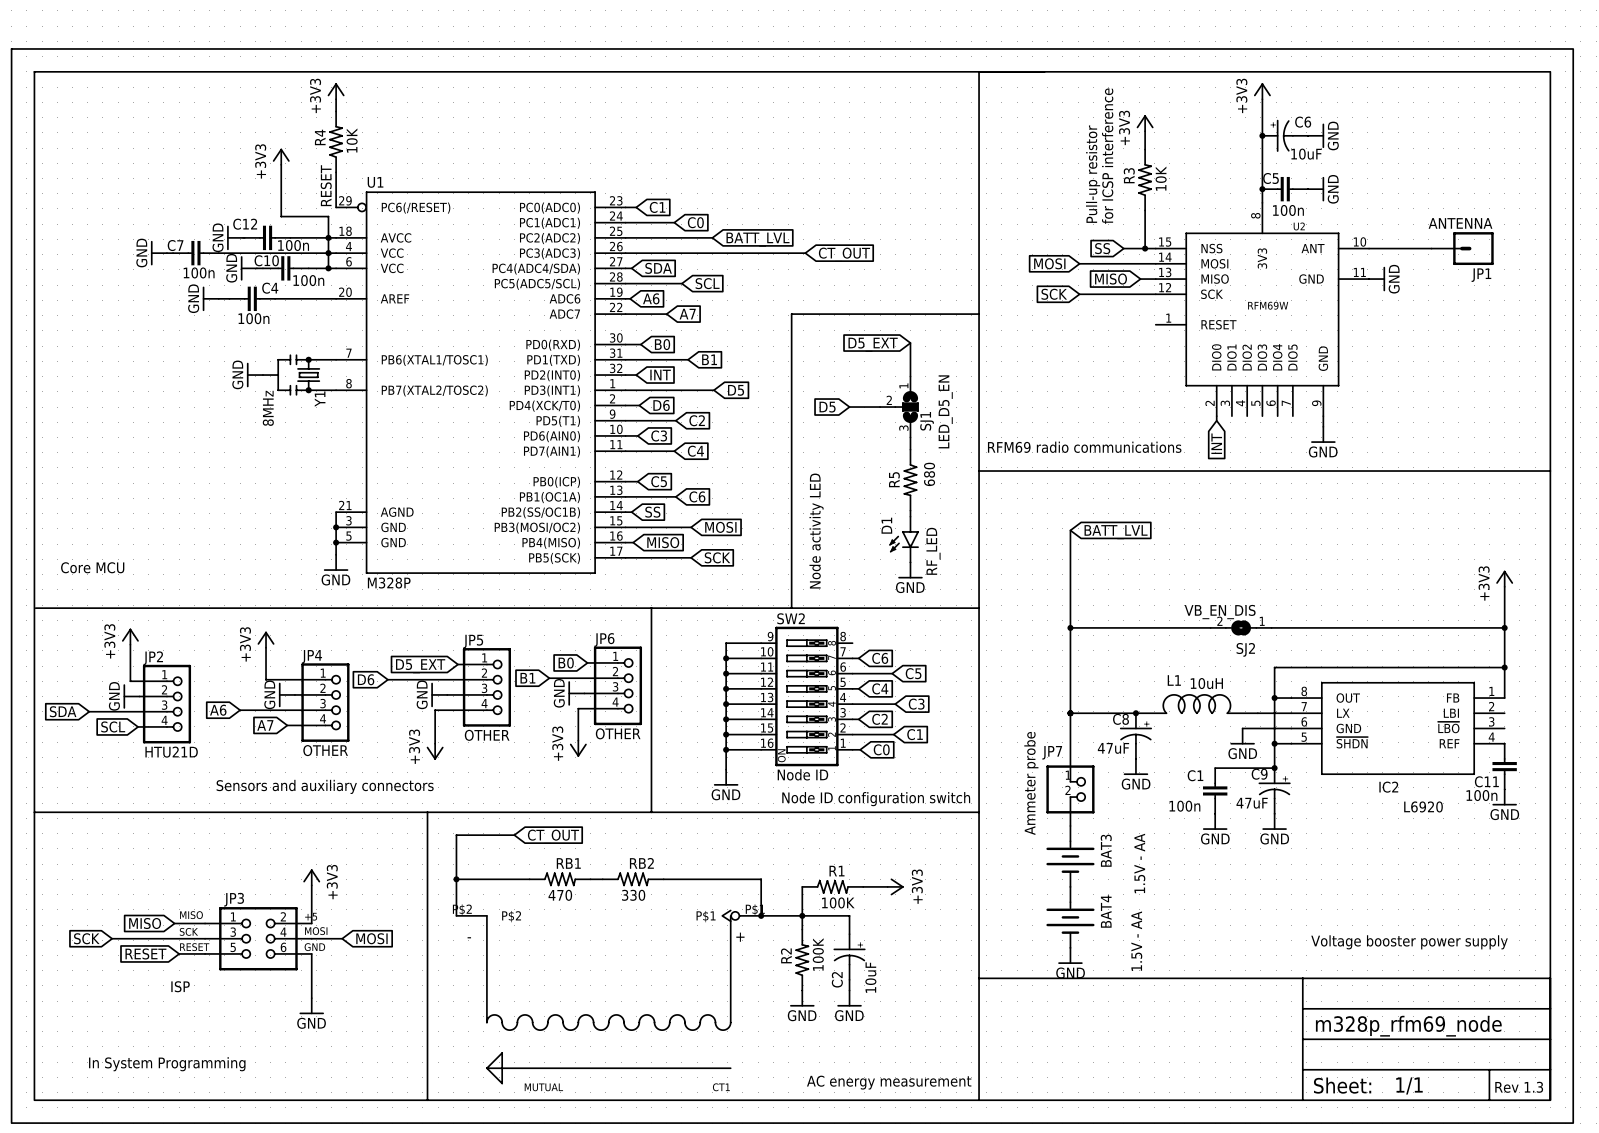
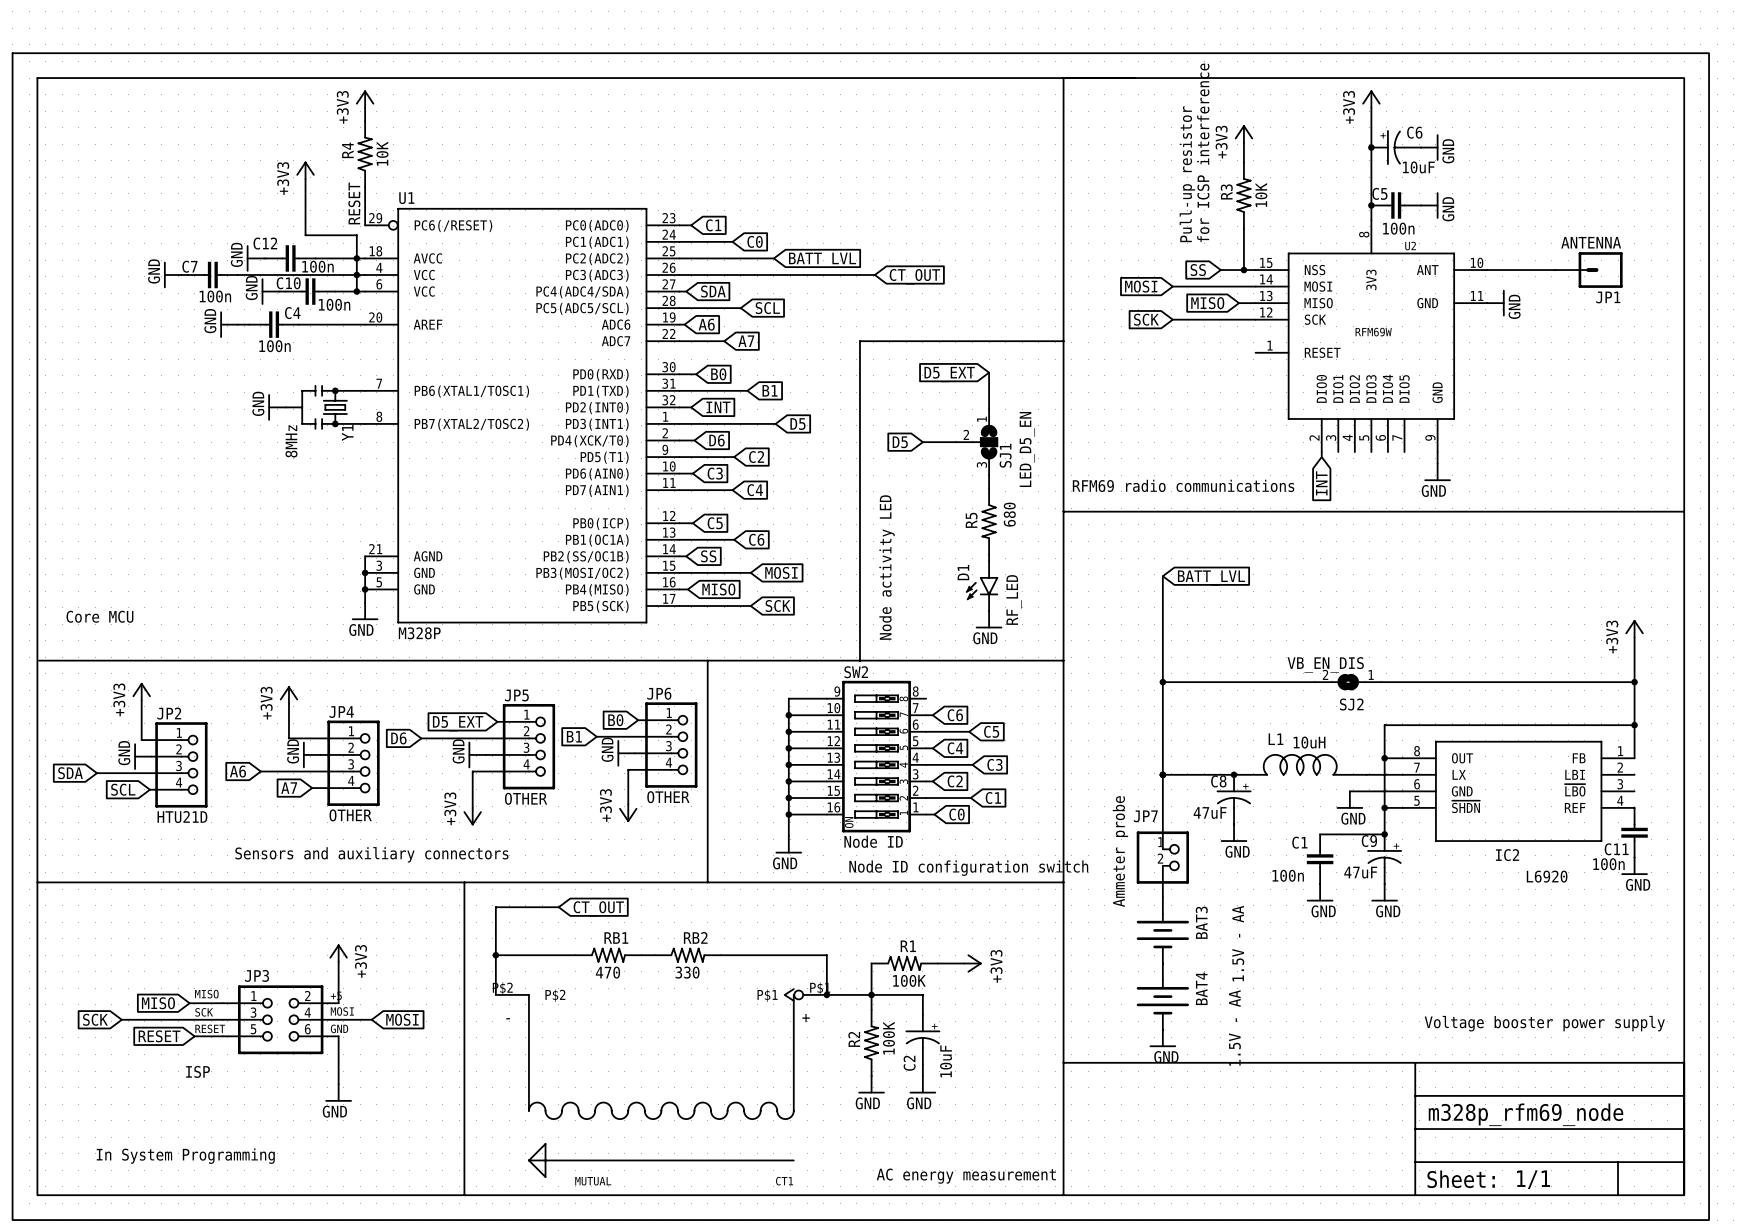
text: Rev 1.3 (1519, 1087) -> none

